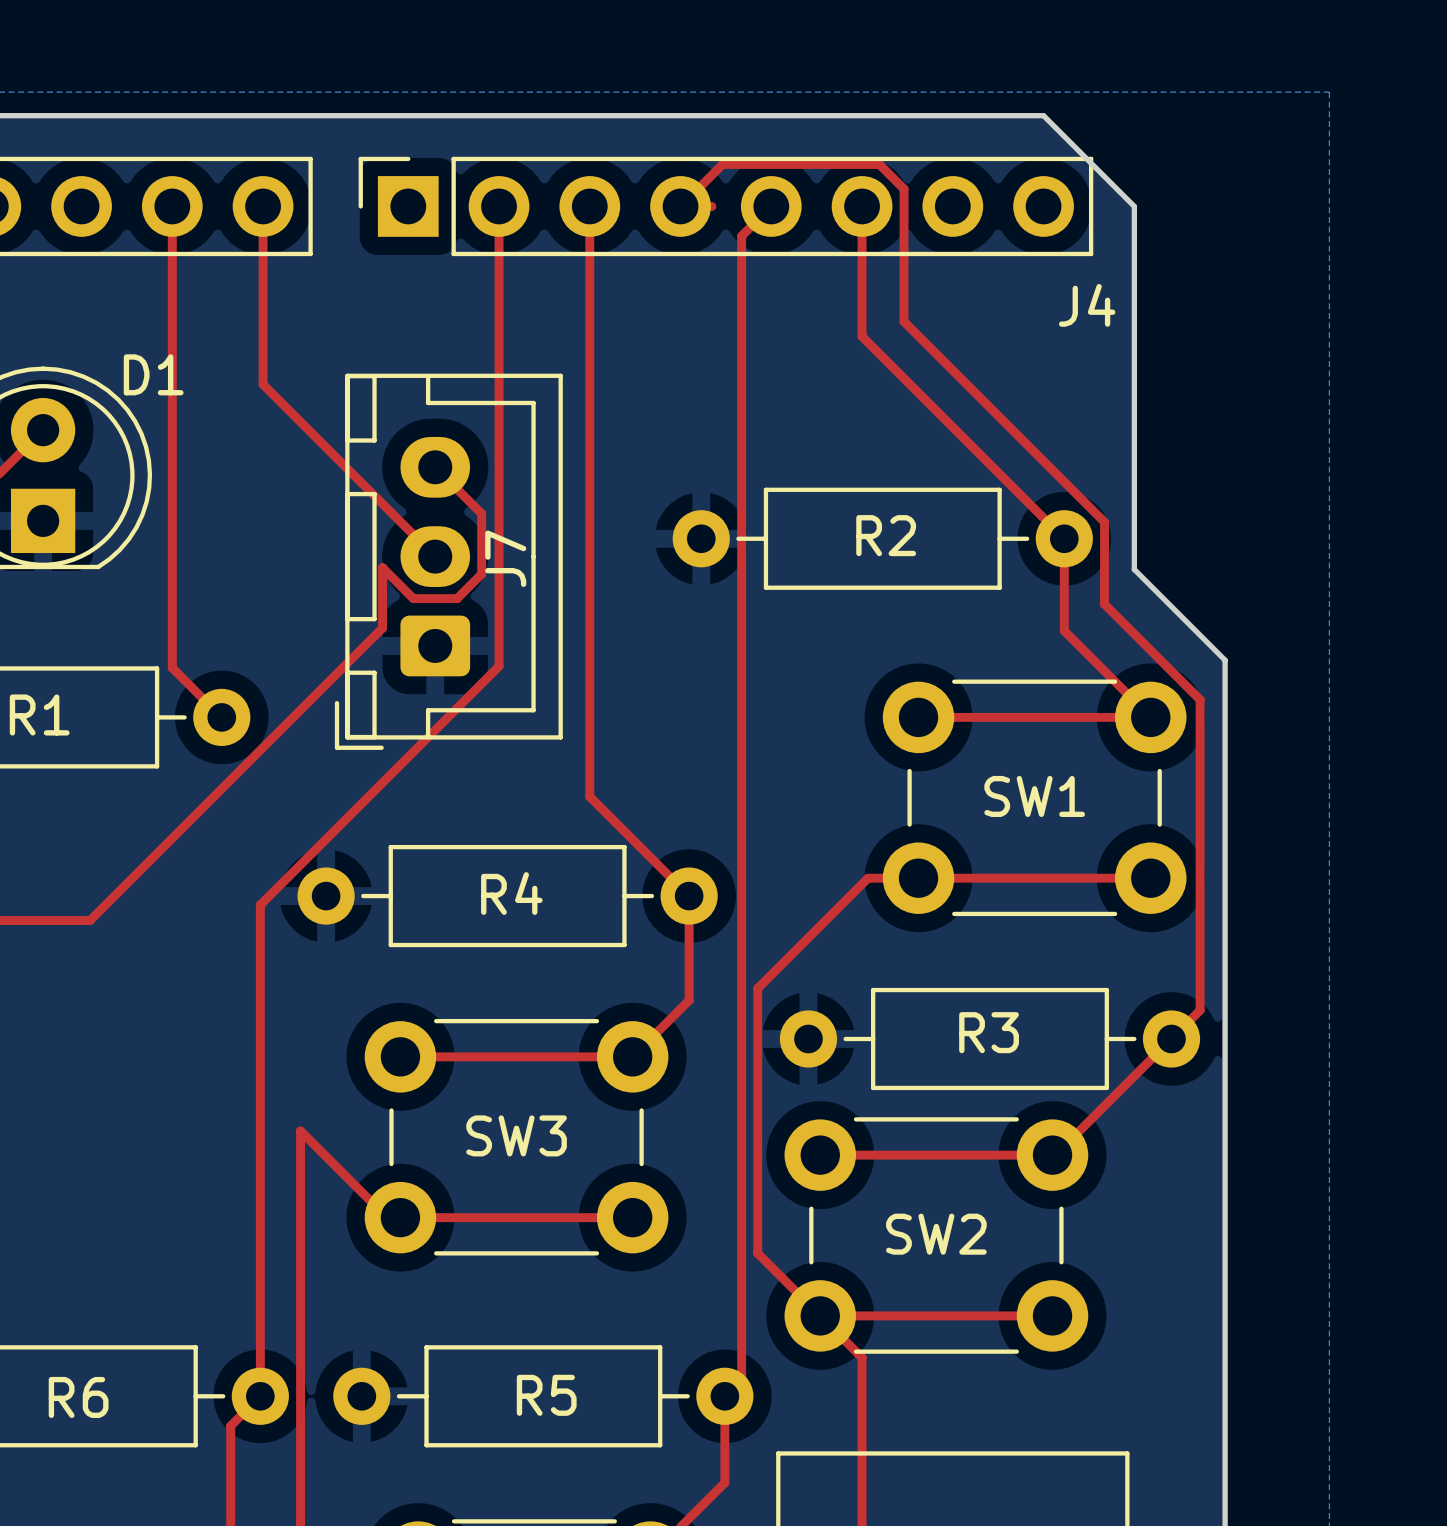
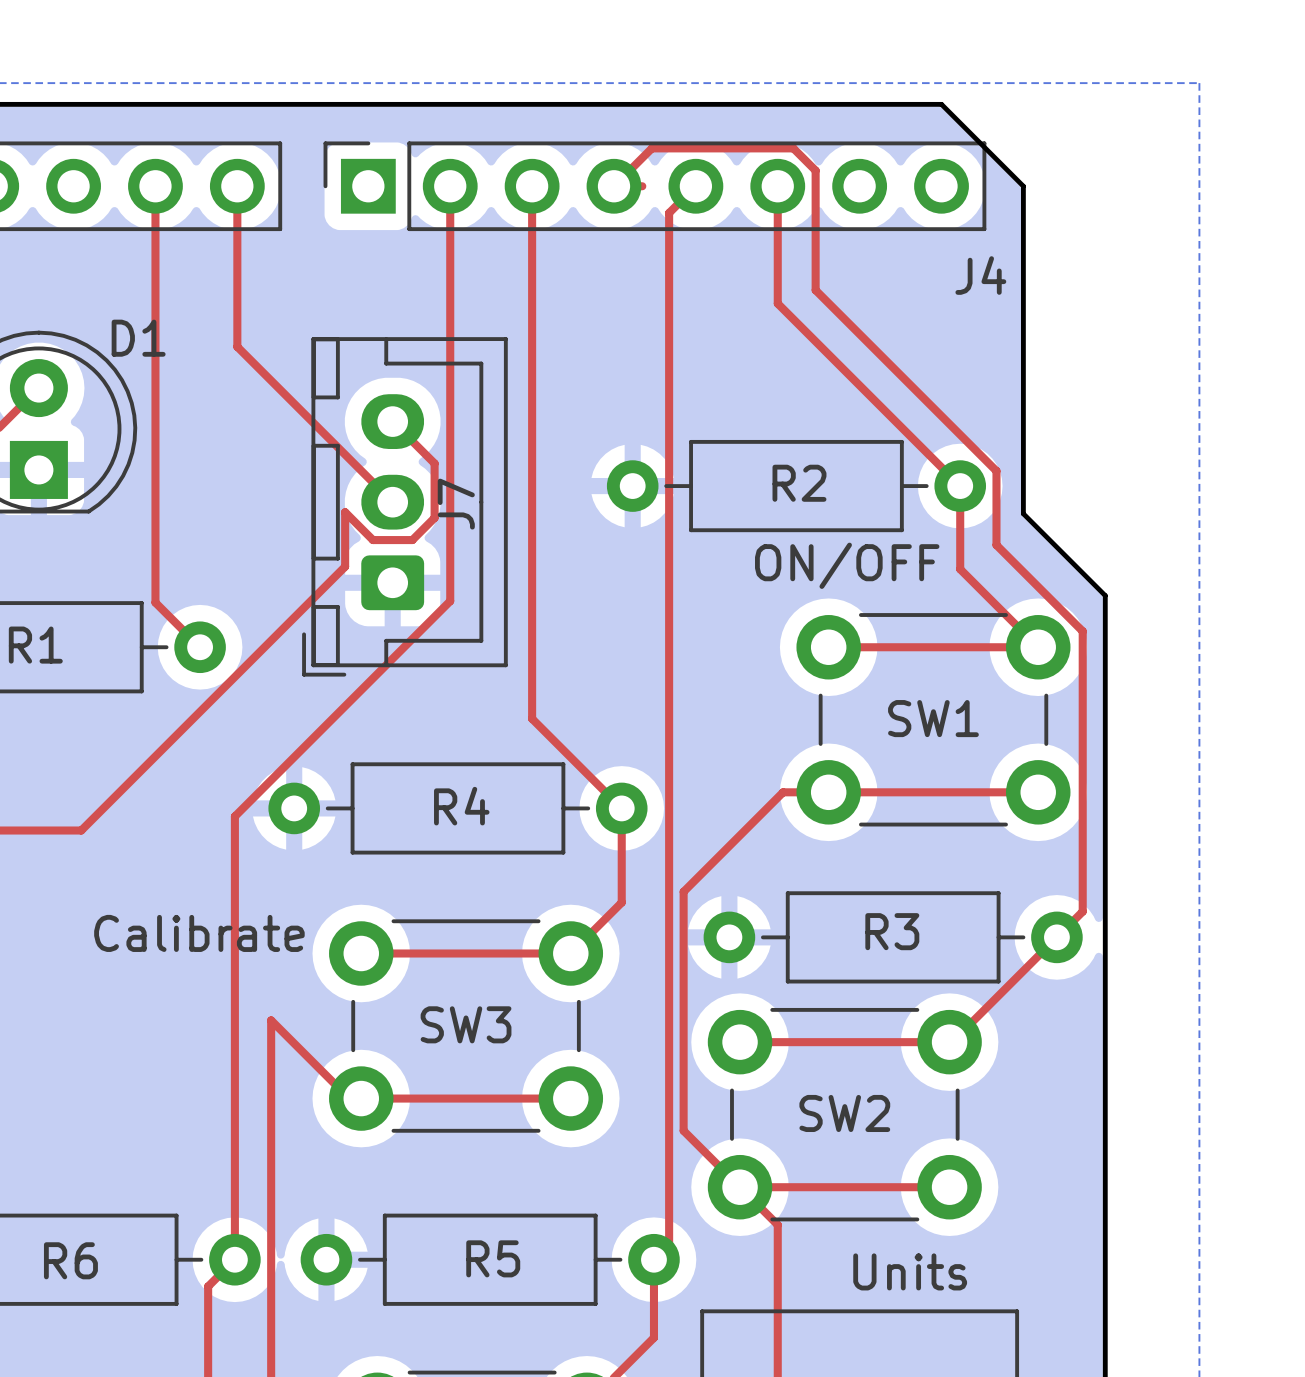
text: none -> ON/OFF (847, 565)
text: none -> Calibrate (199, 933)
text: none -> Units (910, 1271)

